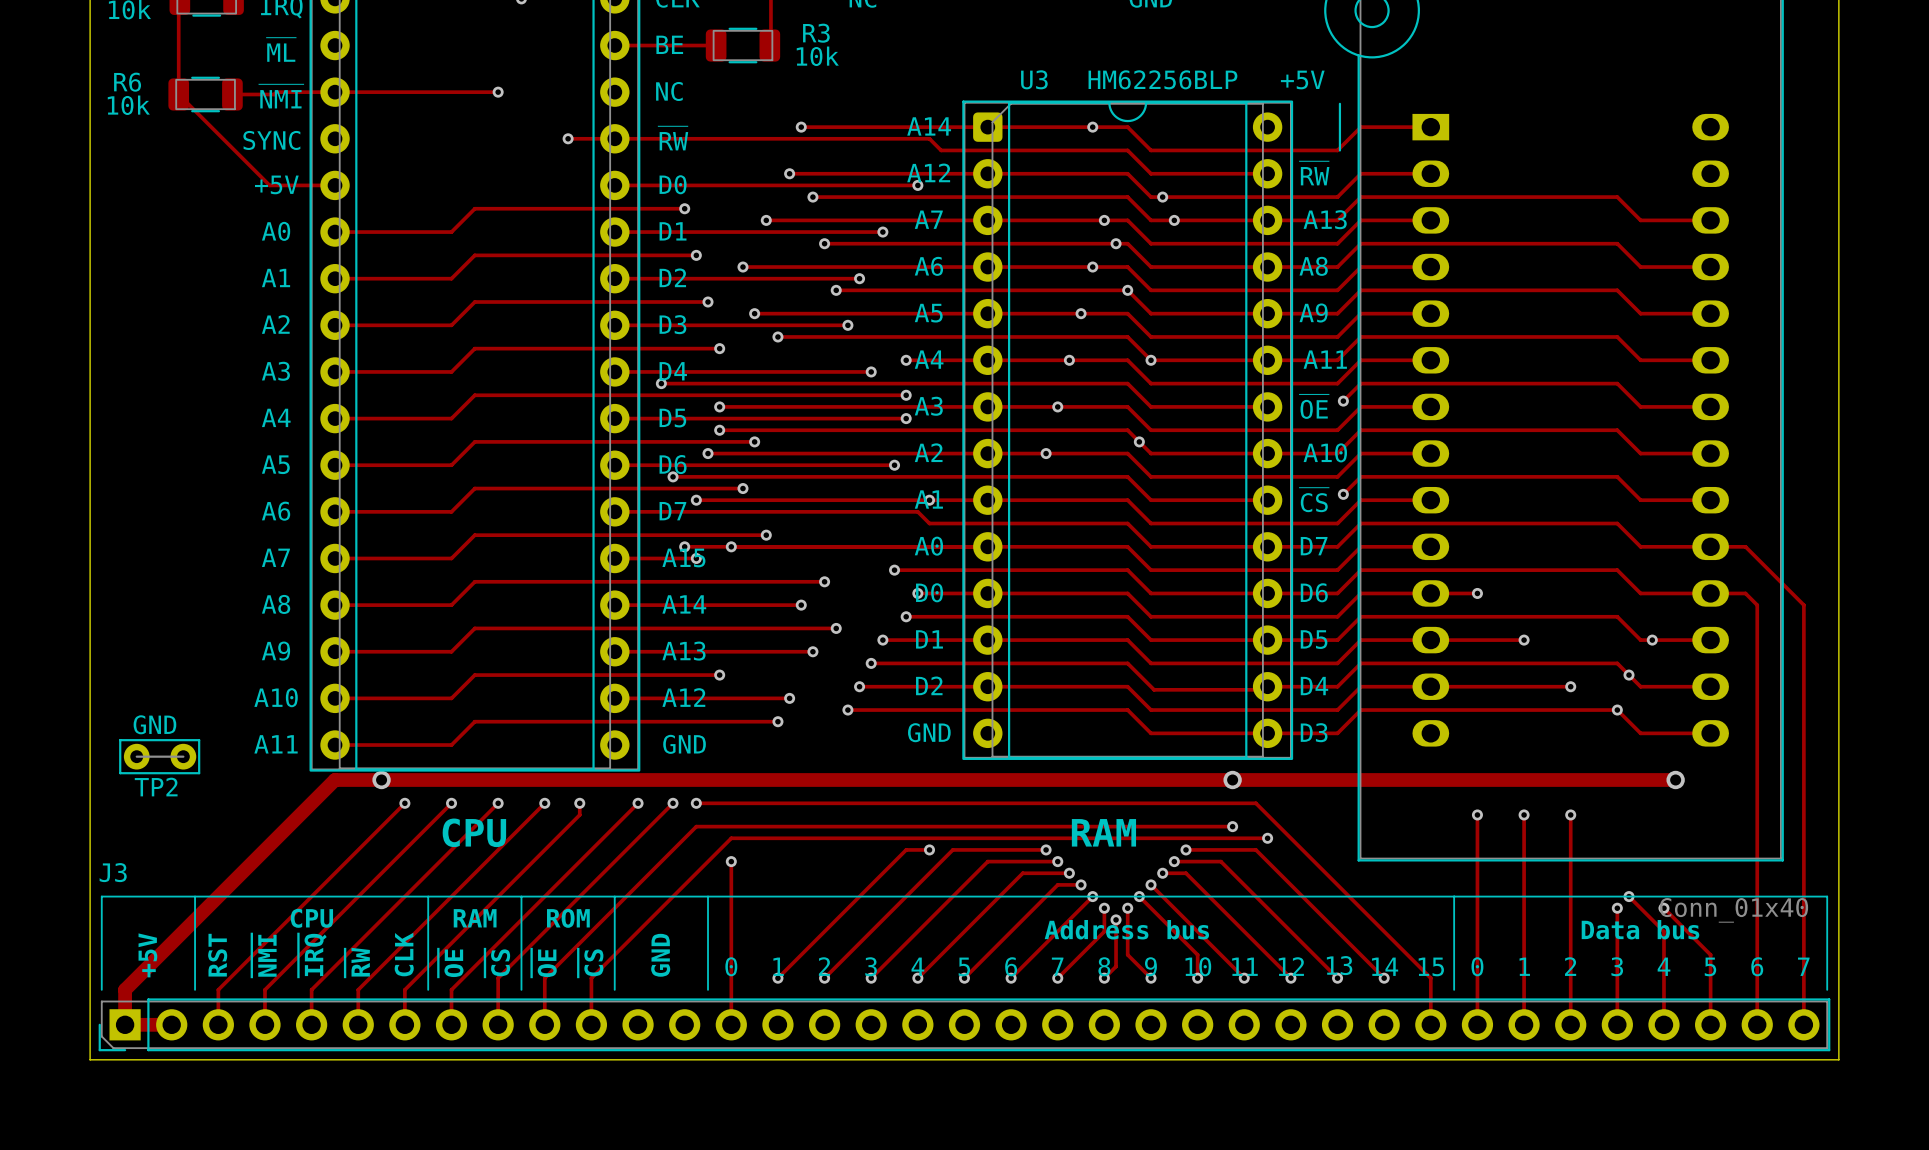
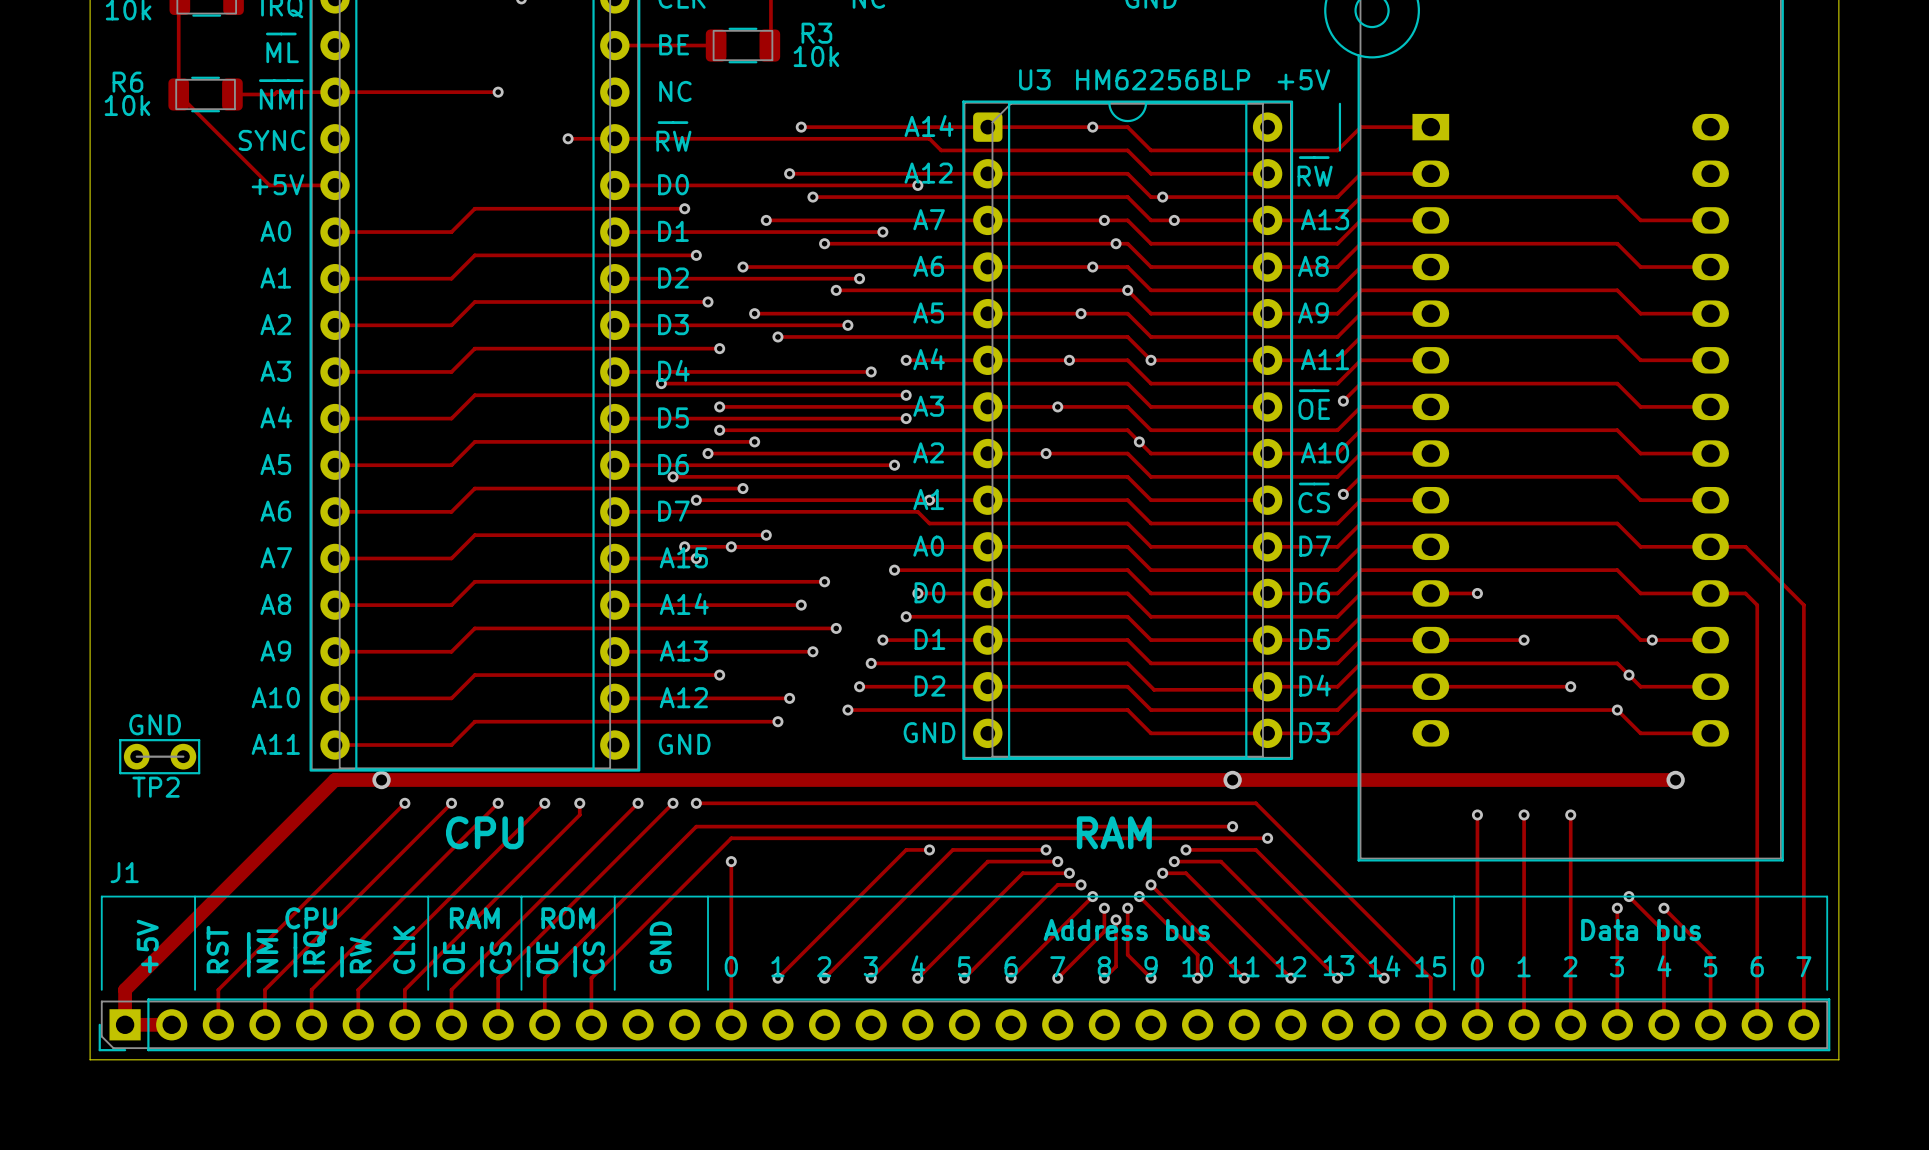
J3 name: J3 (113, 872) -> J1 (124, 872)
J3 value: Conn_01x40 (1733, 910) -> none

